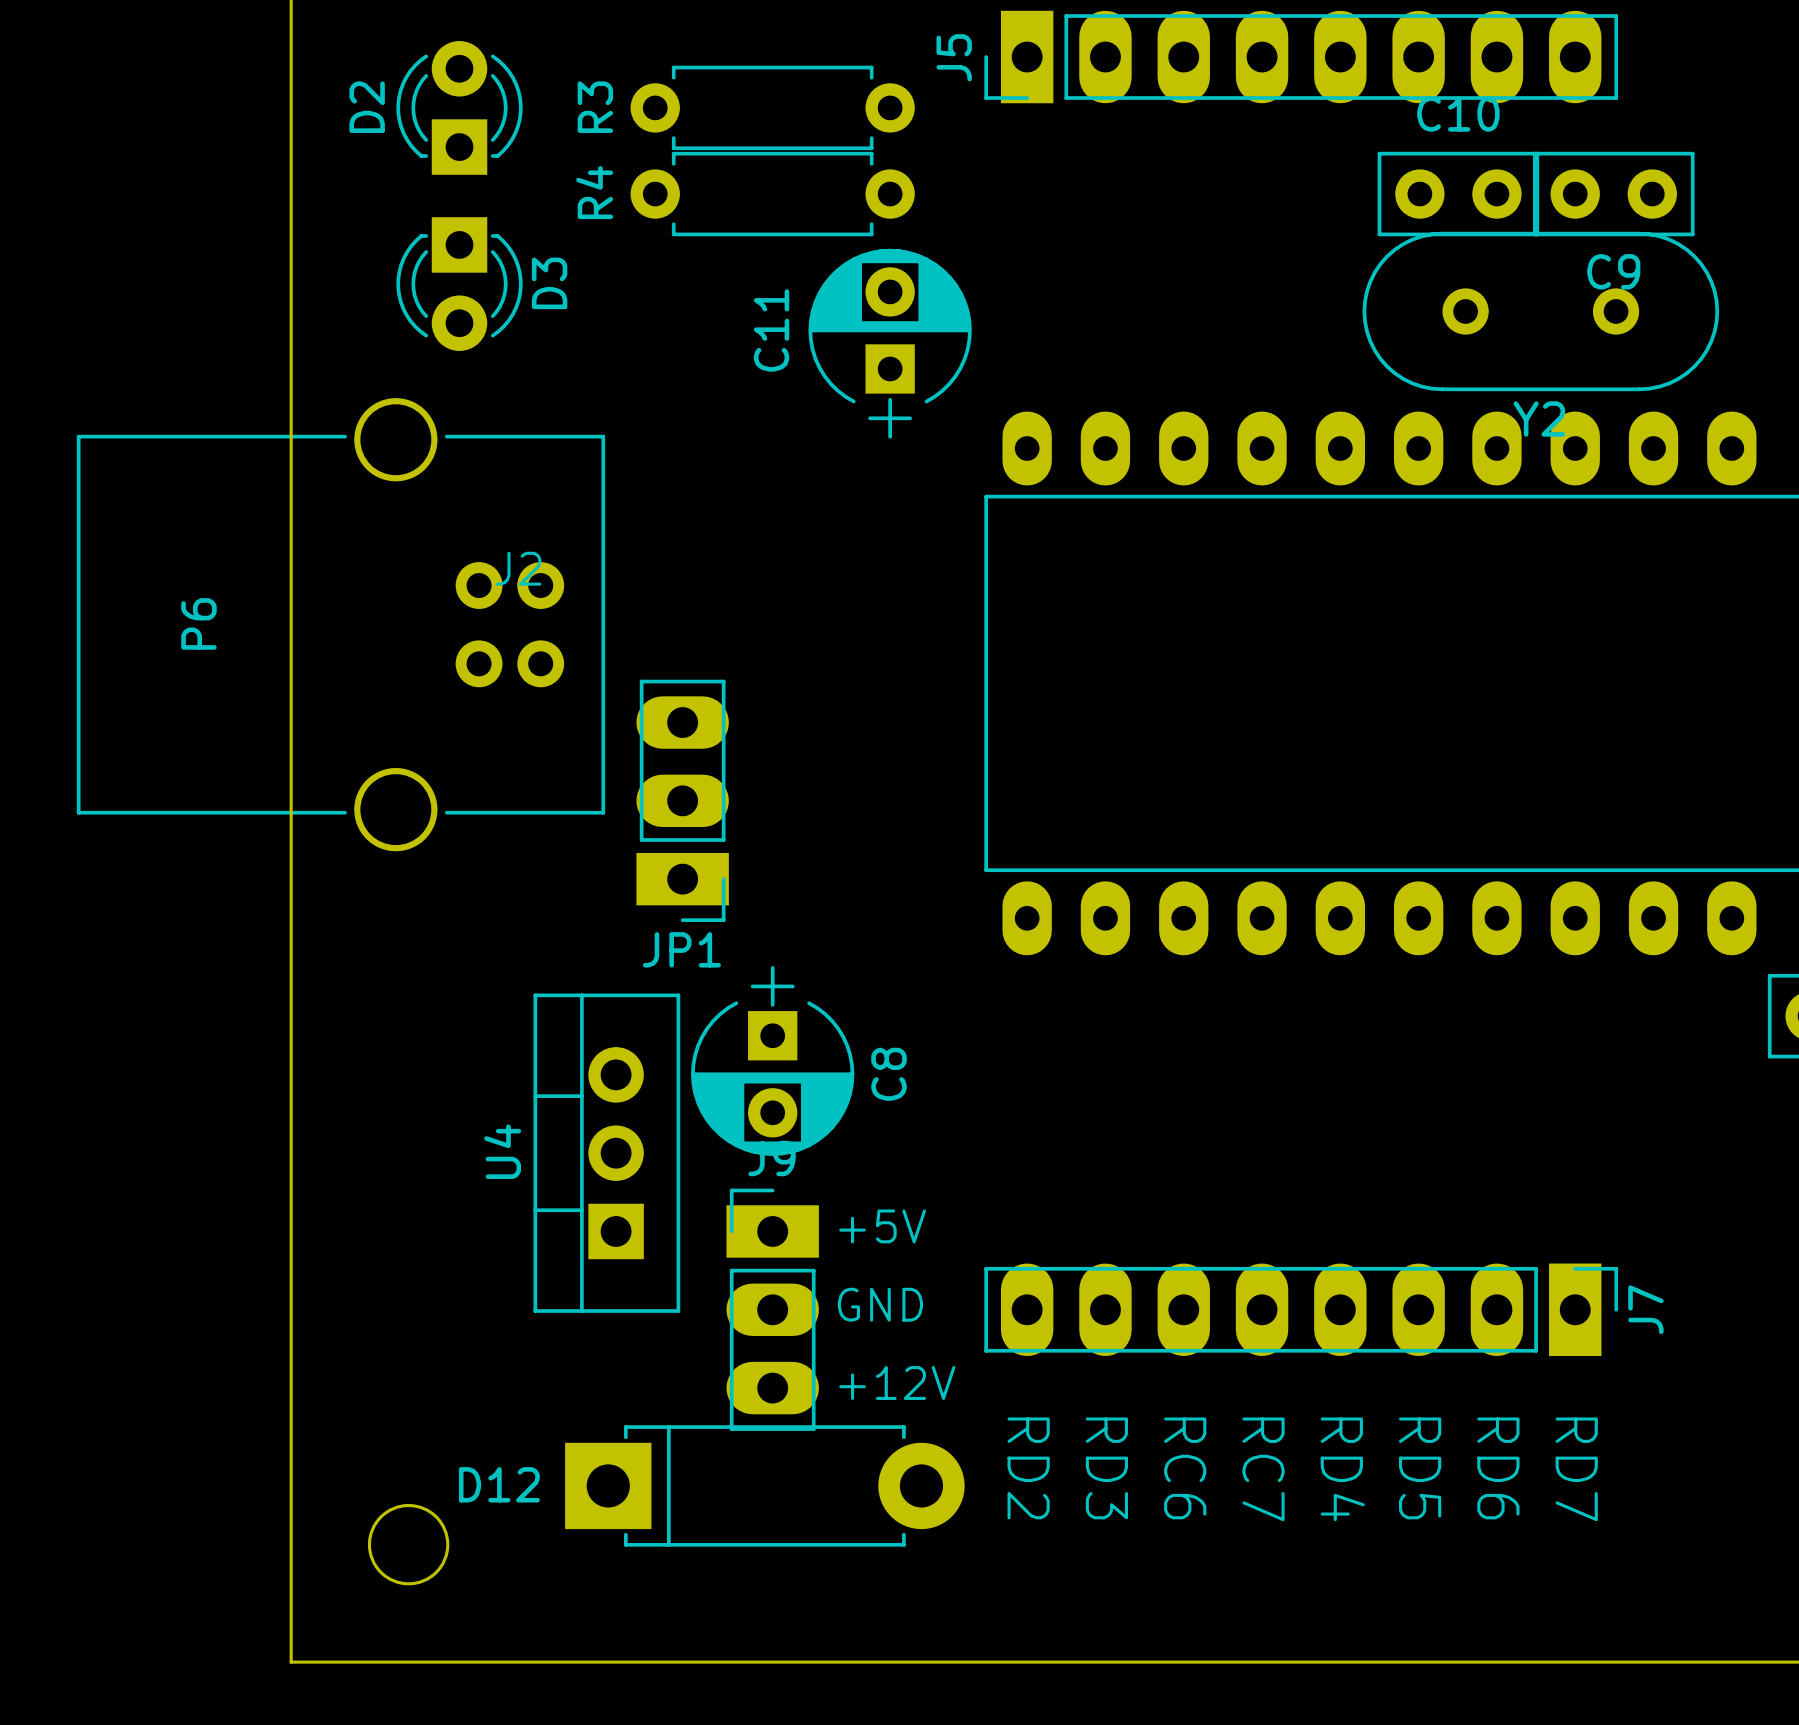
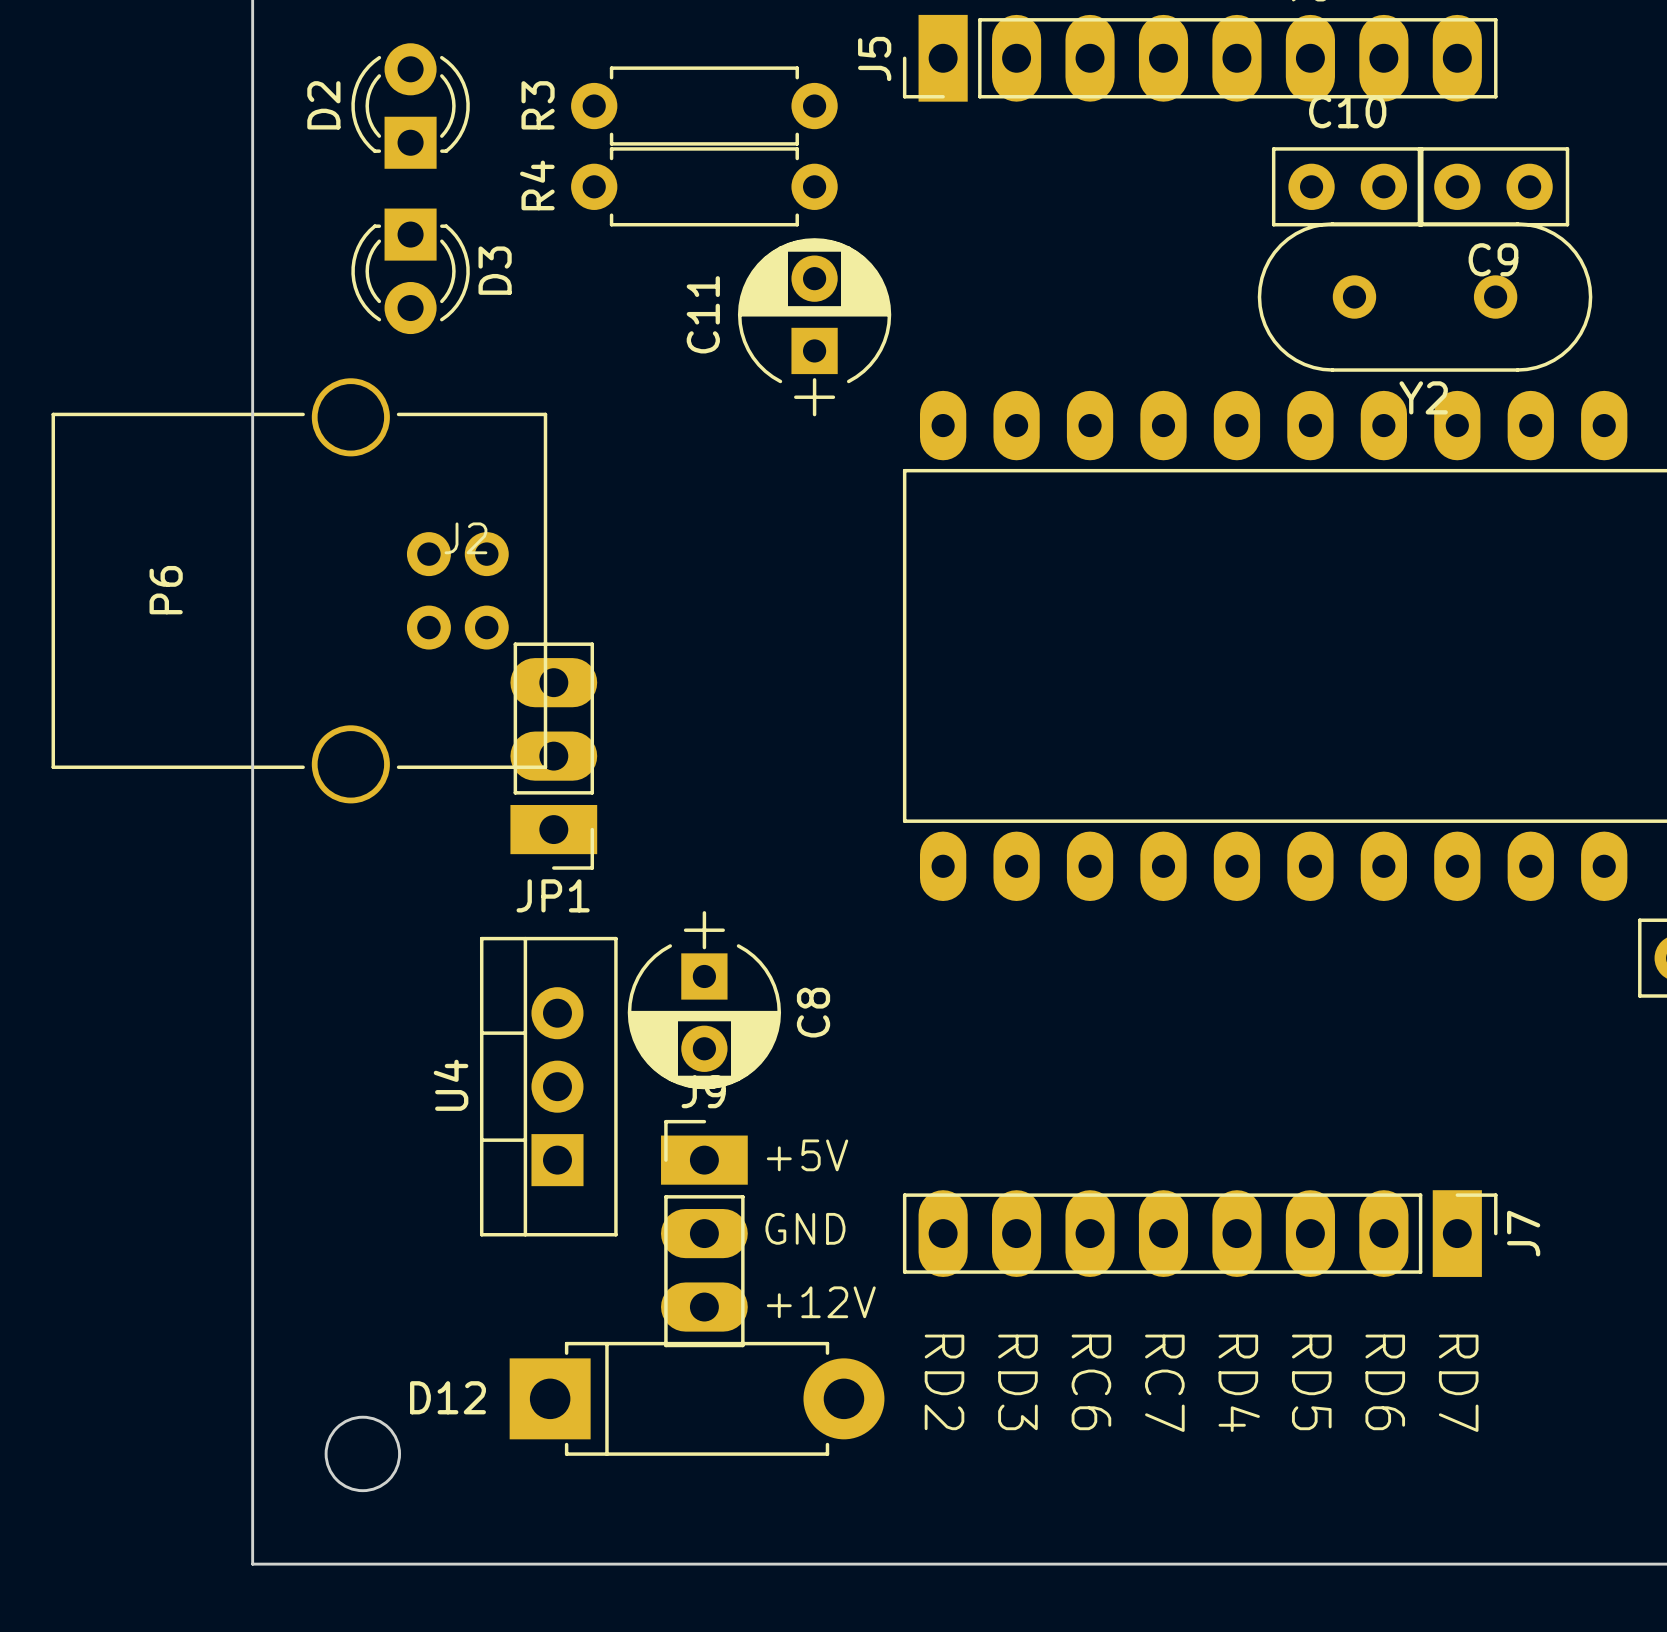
JP1 position: (682, 800) -> (553, 756)

